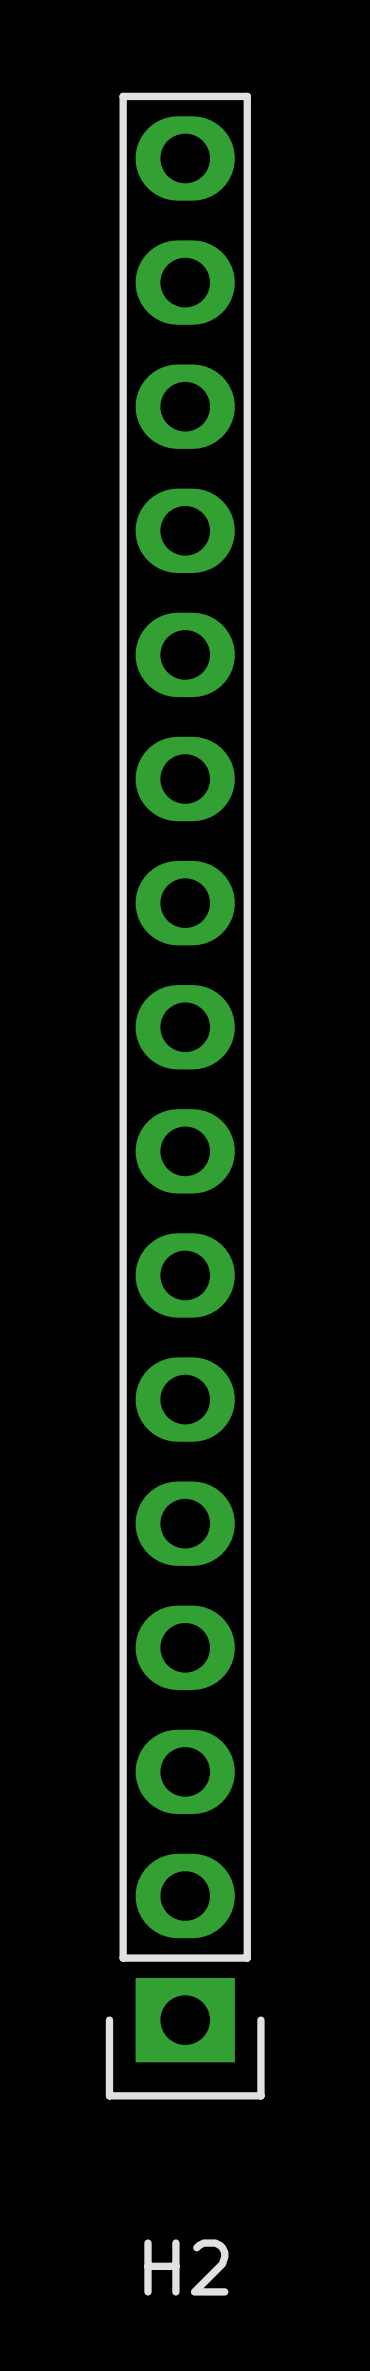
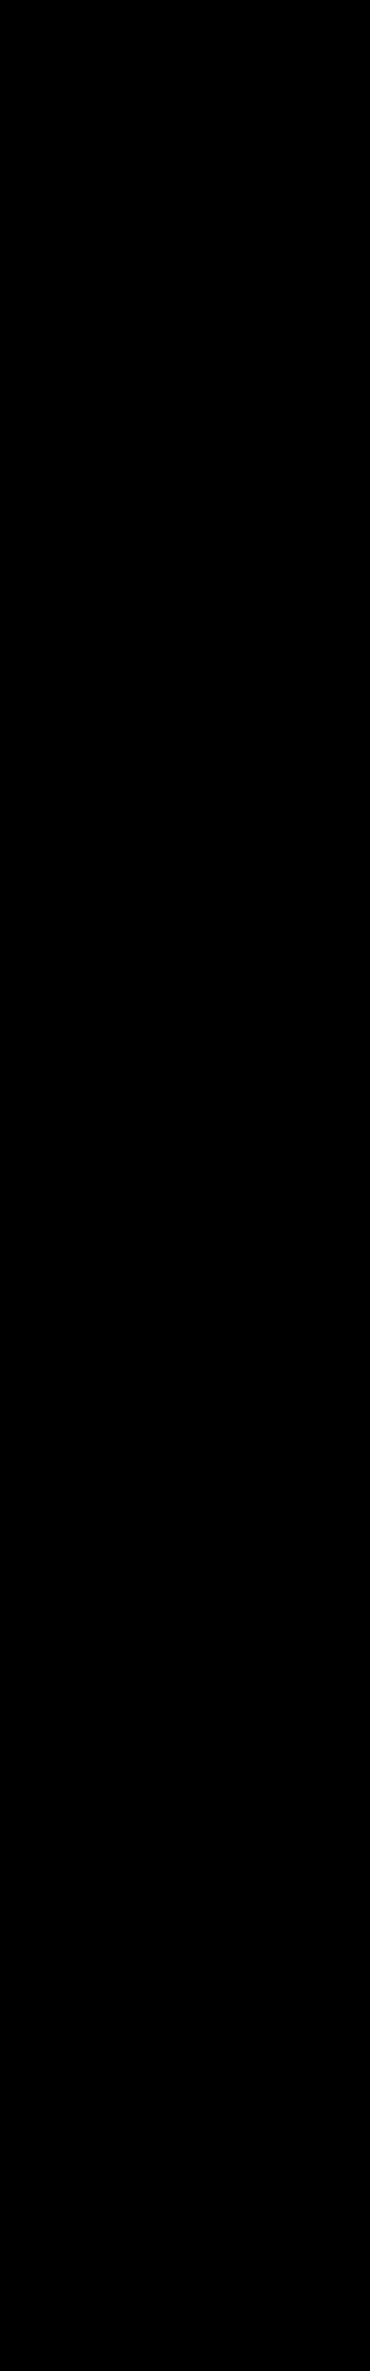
H2: (185, 1096) -> none

